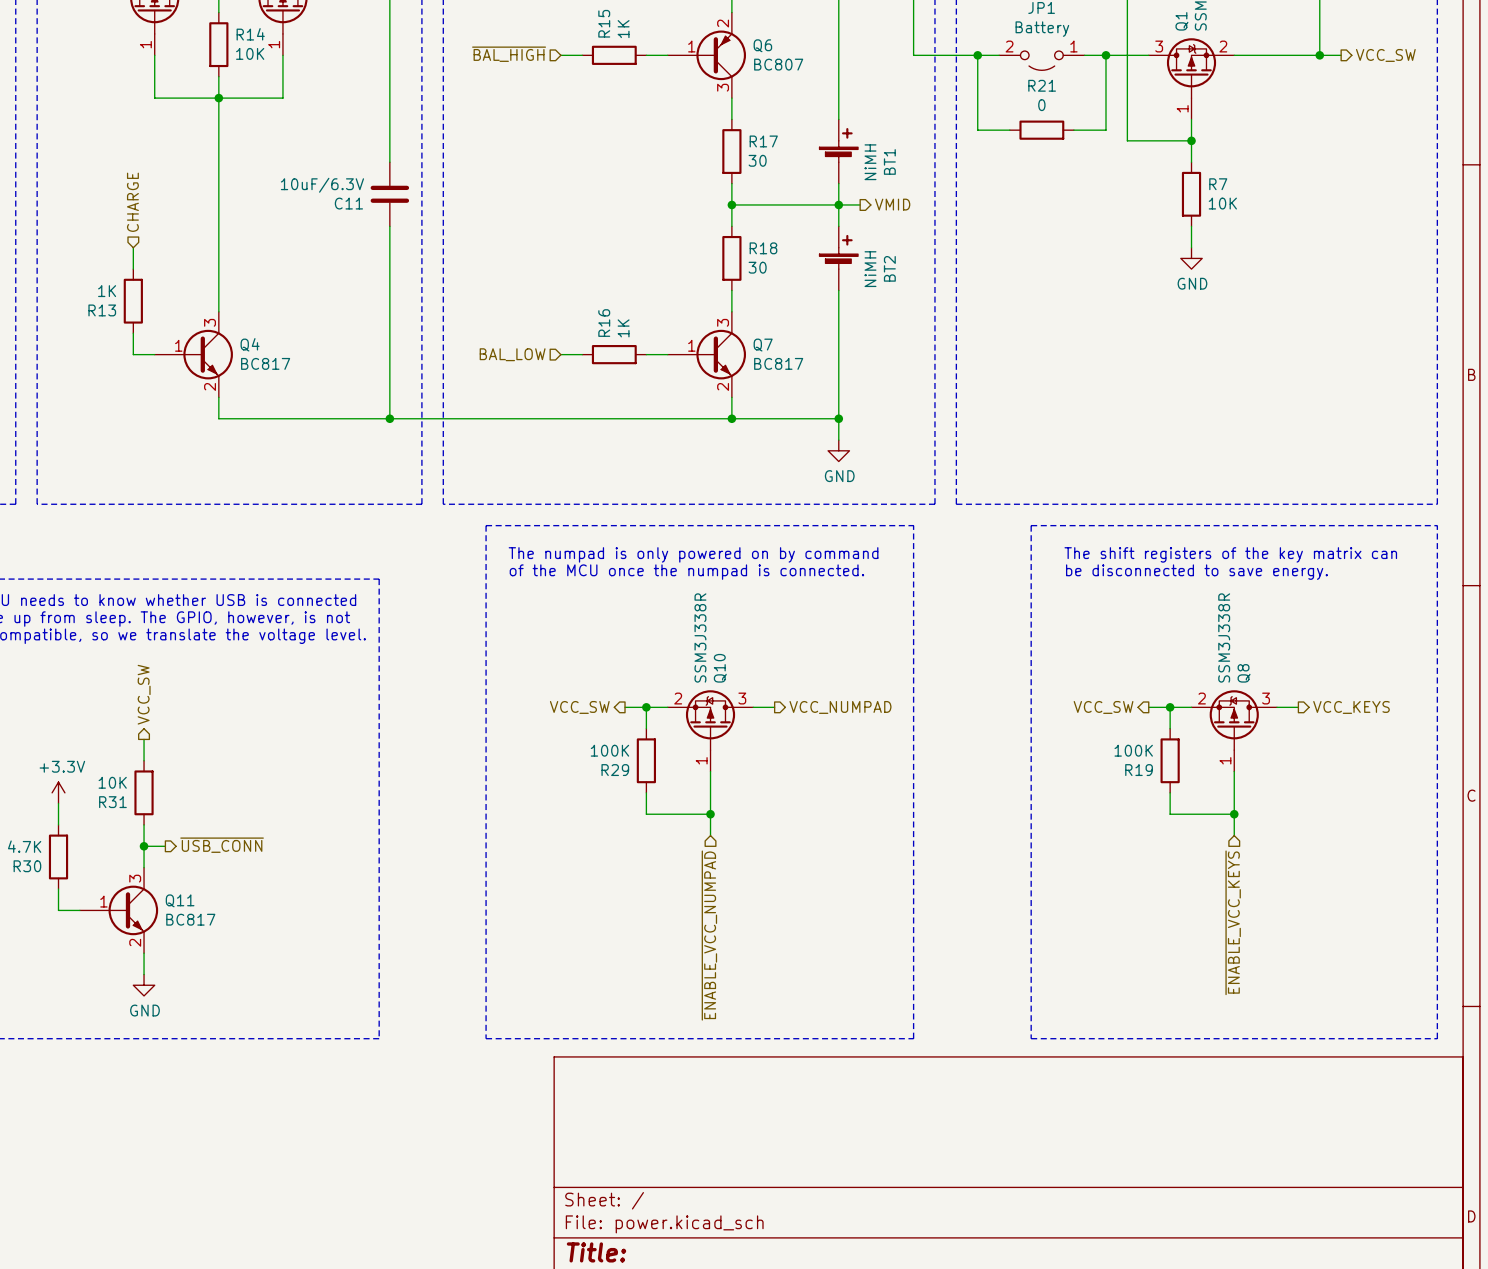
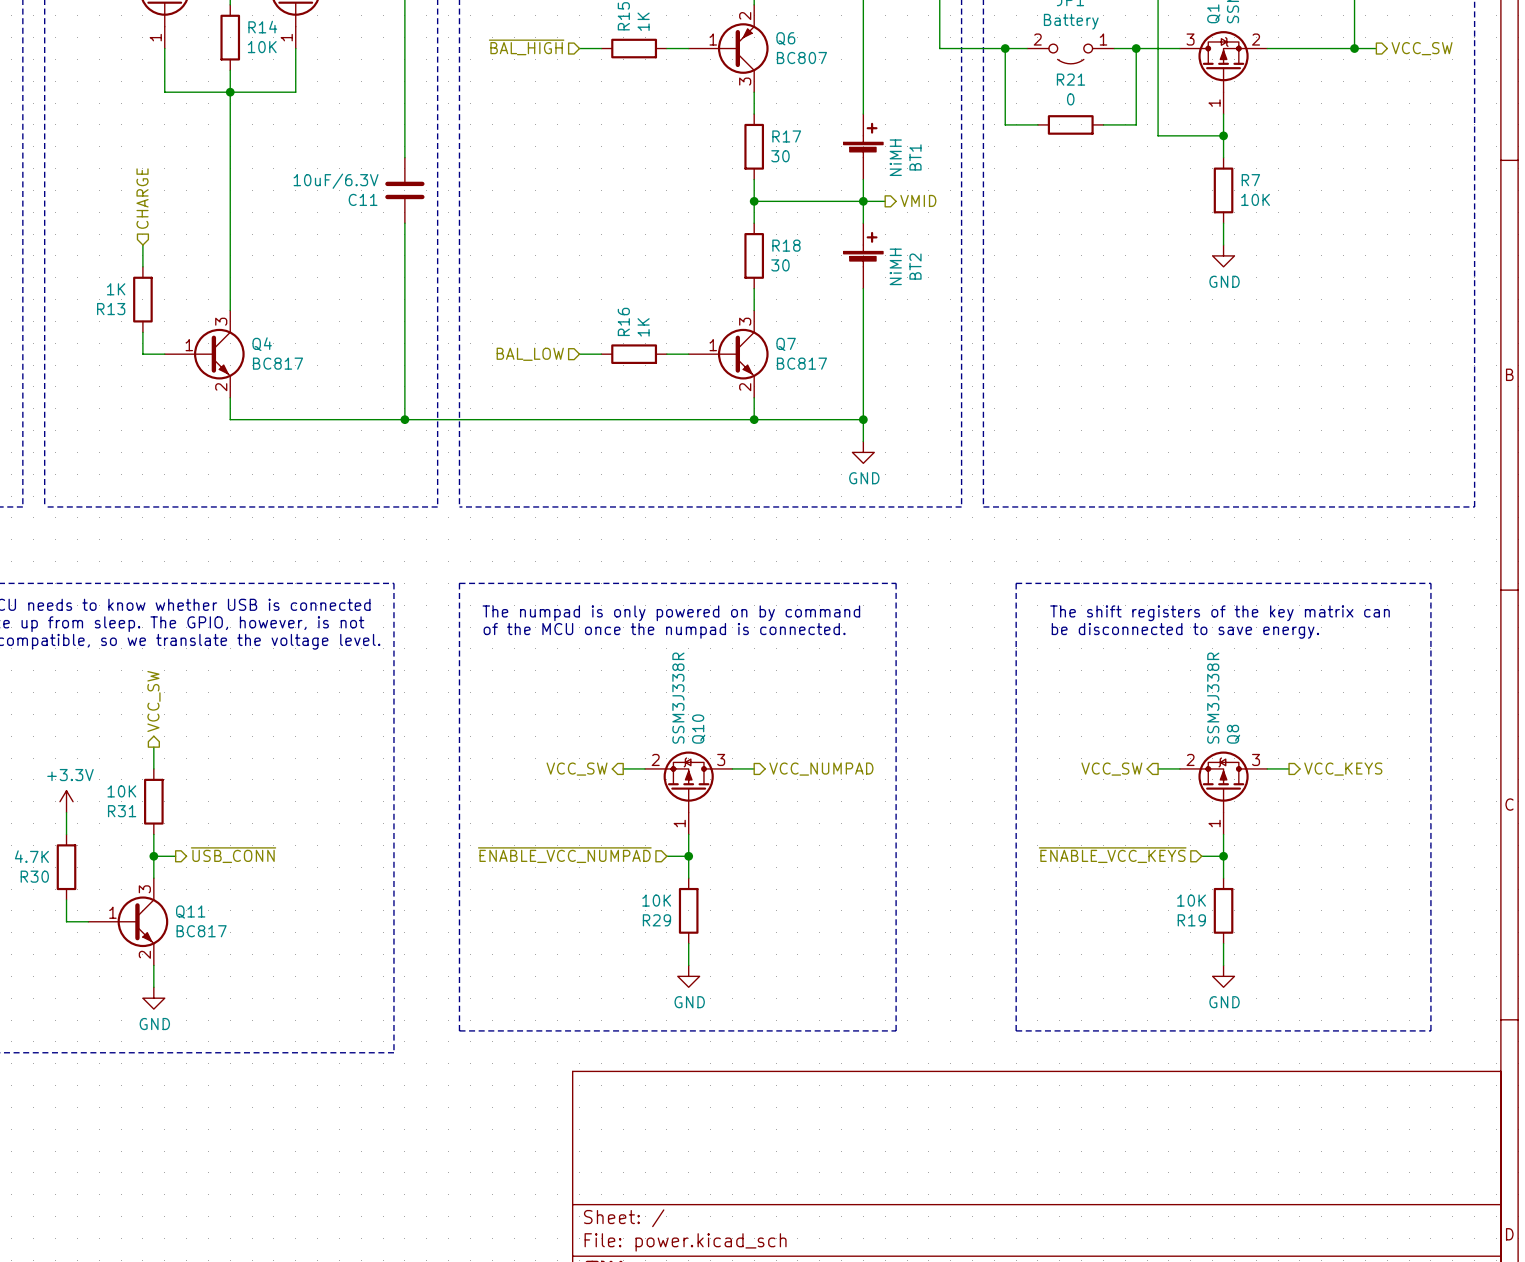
line: (486, 525) (486, 1038) (913, 1038) (913, 525) (486, 525) -> (459, 583) (459, 1030) (896, 1030) (896, 583) (459, 583)
line: (1031, 525) (1437, 525) (1437, 1038) (1031, 1038) (1031, 525) -> (1016, 583) (1016, 1030) (1430, 1030) (1430, 583) (1016, 583)
text position: The numpad is only powered on by command (693, 554) -> The numpad is only powered on by command (671, 613)
text position: The shift registers of the key matrix can (1230, 554) -> The shift registers of the key matrix can (1220, 613)
text position: of the MCU once the numpad is connected. (686, 572) -> of the MCU once the numpad is connected. (664, 630)
text position: be disconnected to save energy. (1196, 572) -> be disconnected to save energy. (1185, 630)
hierarchical label position: VCC_SW (579, 707) -> VCC_SW (577, 769)
wire: (625, 707) (667, 707) -> none
wire: (646, 707) (646, 728) -> none
junction: (646, 707) -> none
wire: (753, 707) (774, 707) -> (732, 768) (754, 768)
hierarchical label position: VCC_NUMPAD (840, 707) -> VCC_NUMPAD (821, 769)
hierarchical label position: VCC_SW (1103, 707) -> VCC_SW (1111, 769)
wire: (1148, 707) (1191, 707) -> none
wire: (1170, 707) (1170, 728) -> none
junction: (1170, 707) -> none
wire: (1277, 707) (1298, 707) -> (1267, 768) (1289, 768)
hierarchical label position: VCC_KEYS (1351, 707) -> VCC_KEYS (1343, 769)
Q10 position: (710, 730) -> (688, 792)
Q8 position: (1234, 730) -> (1223, 792)
R29 value: 100K (609, 750) -> 10K (656, 900)
R19 value: 100K (1133, 750) -> 10K (1191, 900)
wire: none -> (623, 768) (645, 768)
R29 position: (646, 760) -> (688, 910)
wire: none -> (1158, 768) (1179, 768)
R19 position: (1170, 760) -> (1223, 910)
wire: (710, 771) (710, 835) -> none
wire: (1234, 771) (1234, 835) -> none
wire: (646, 792) (646, 814) (710, 814) -> none
wire: (1170, 792) (1170, 814) (1234, 814) -> none
junction: (710, 814) -> none
junction: (1234, 814) -> none
wire: none -> (688, 834) (688, 878)
wire: none -> (1223, 834) (1223, 878)
wire: none -> (666, 856) (688, 856)
junction: none -> (688, 856)
wire: none -> (1201, 856) (1223, 856)
junction: none -> (1223, 856)
hierarchical label rotation: 0° (1233, 922) -> 90° clockwise (1112, 855)
hierarchical label position: ~{ENABLE_VCC_KEYS} (1233, 922) -> ~{ENABLE_VCC_KEYS} (1112, 855)
wire: none -> (688, 943) (688, 965)
wire: none -> (1223, 943) (1223, 965)
hierarchical label rotation: 0° (709, 935) -> 90° clockwise (564, 855)
power symbol: none -> GND (688, 976)
power symbol: none -> GND (1223, 976)

